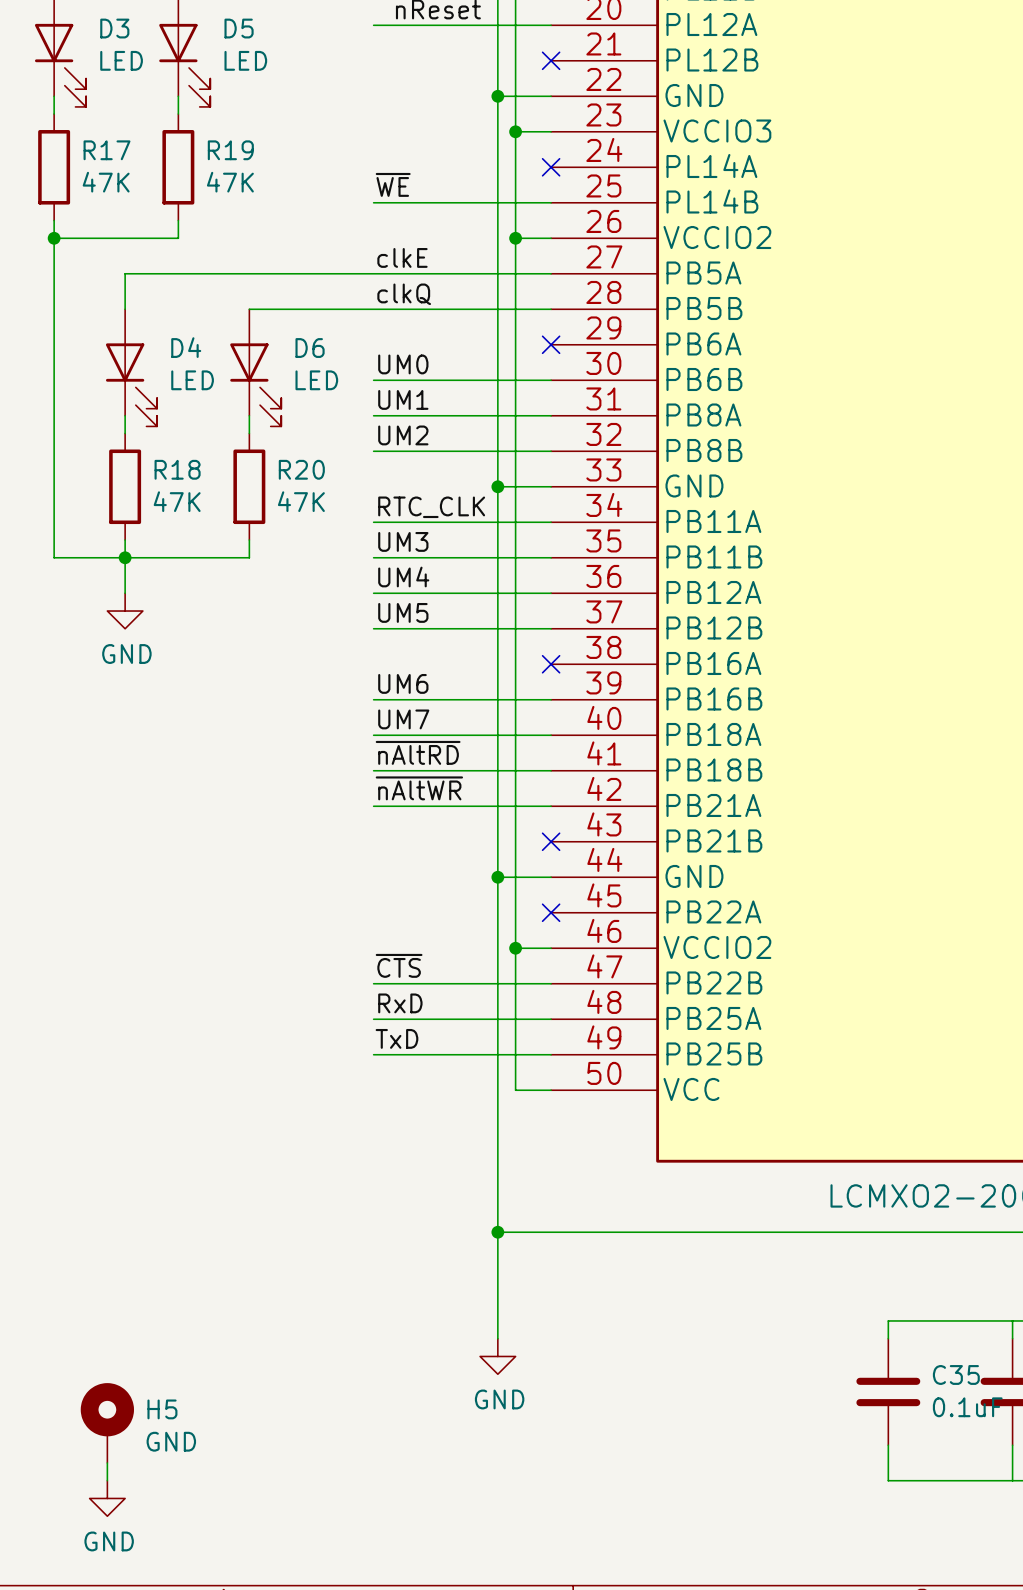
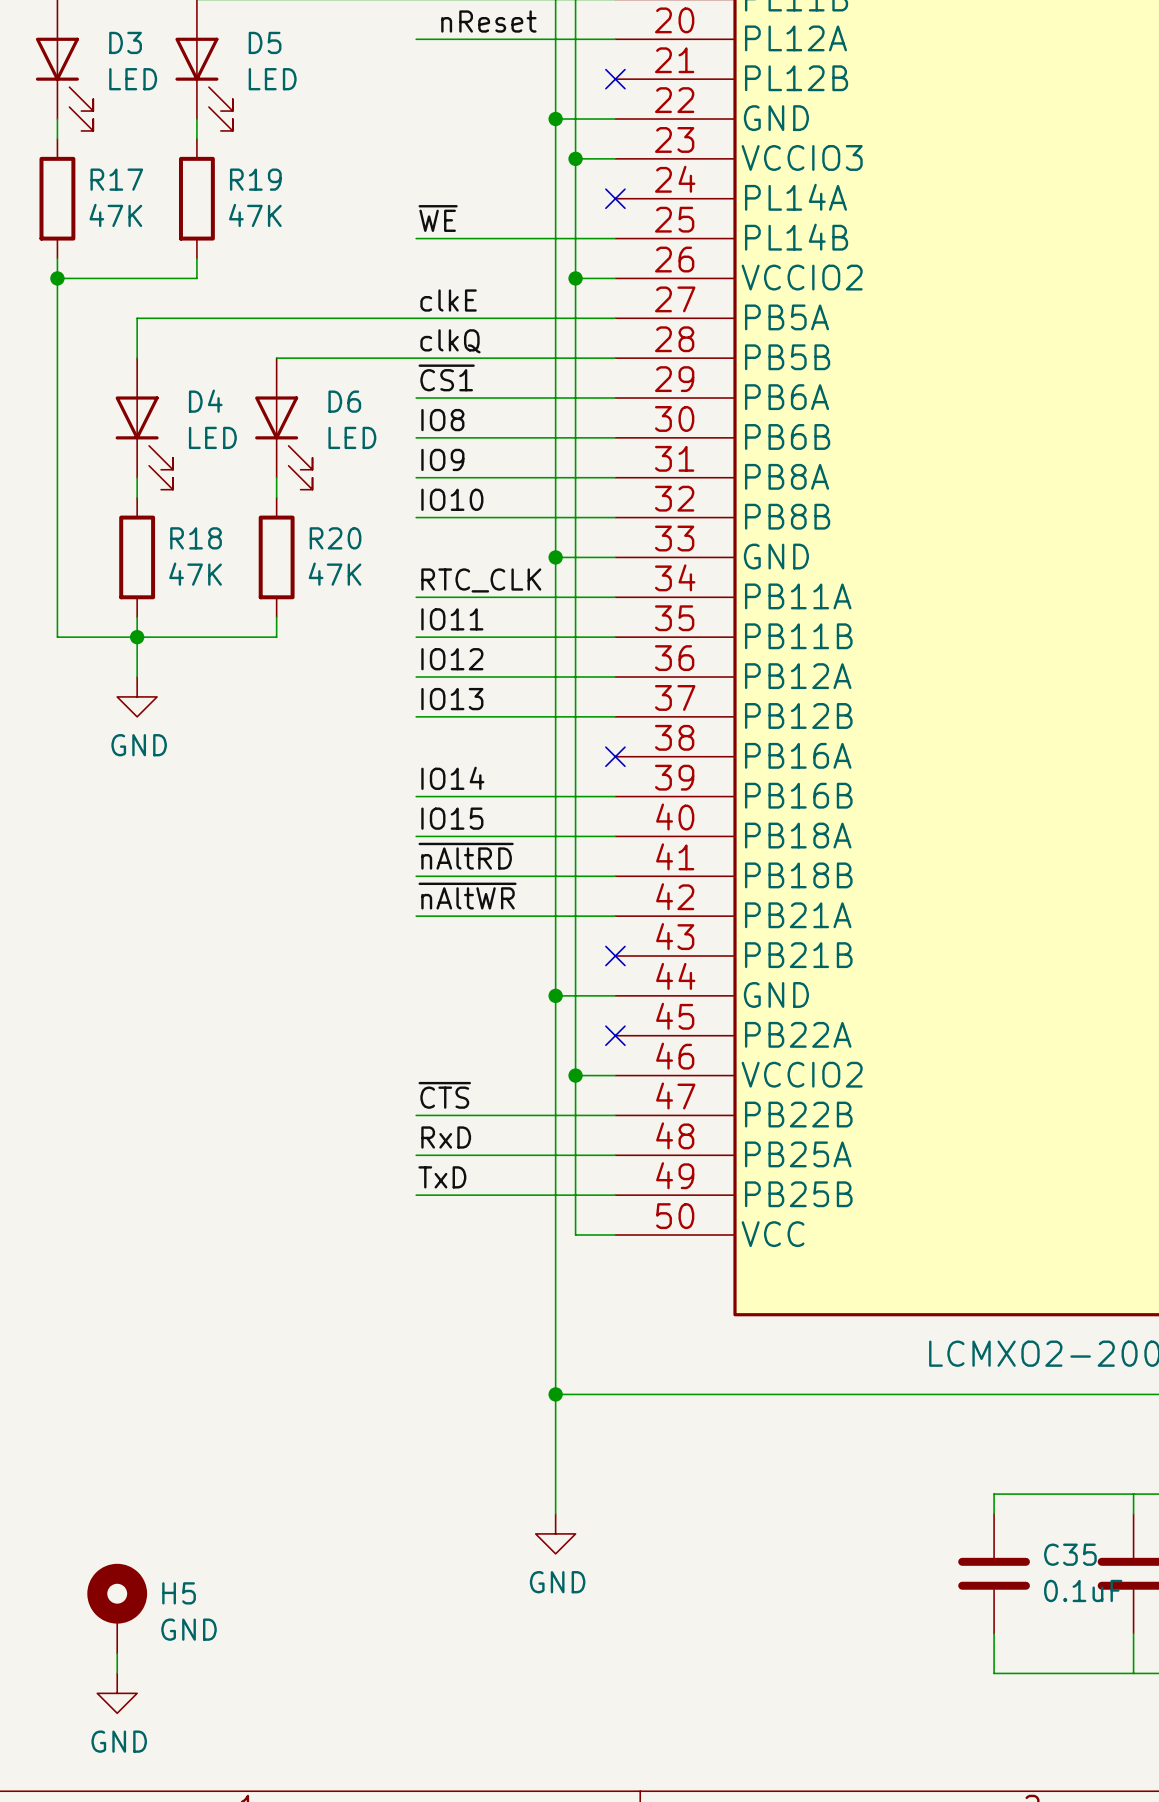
label: none -> ~{CS1} (446, 377)
wire: none -> (416, 398) (615, 398)
no-connect mark: (551, 344) -> none
label: UM0 (403, 364) -> IO8 (442, 420)
label: UM1 (403, 399) -> IO9 (442, 459)
label: UM2 (403, 435) -> IO10 (452, 499)
label: UM3 (403, 541) -> IO11 (452, 619)
label: UM4 (403, 577) -> IO12 (452, 659)
label: UM5 (403, 612) -> IO13 (452, 699)
label: UM6 (403, 683) -> IO14 (452, 778)
label: UM7 (403, 719) -> IO15 (452, 818)

